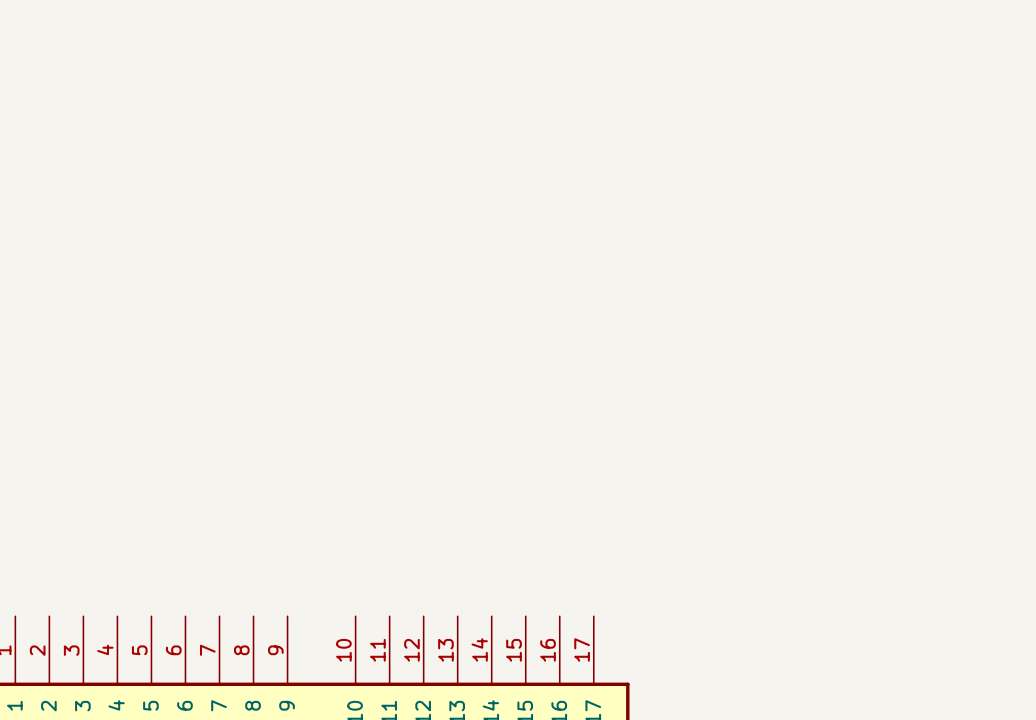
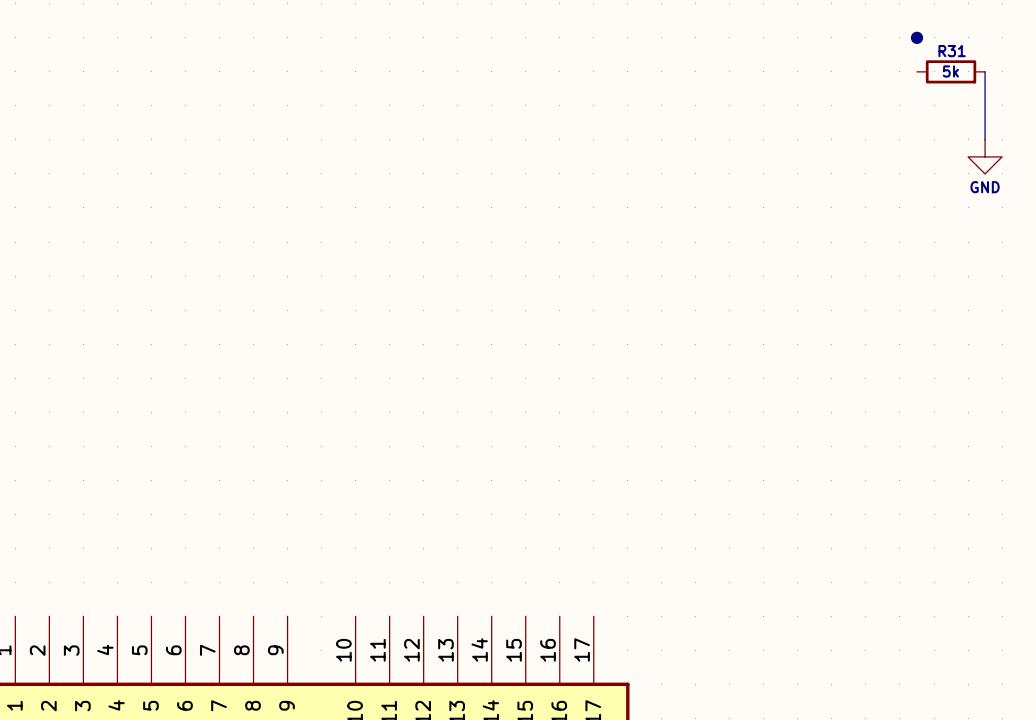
junction: none -> (917, 37)
R31: none -> 5k (951, 71)
wire: none -> (985, 71) (985, 139)
power symbol: none -> GND (985, 156)

